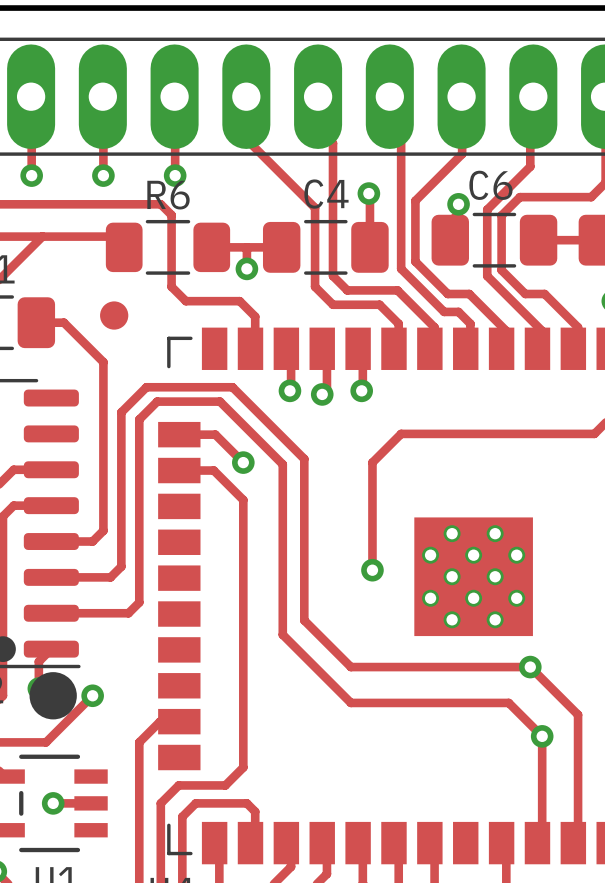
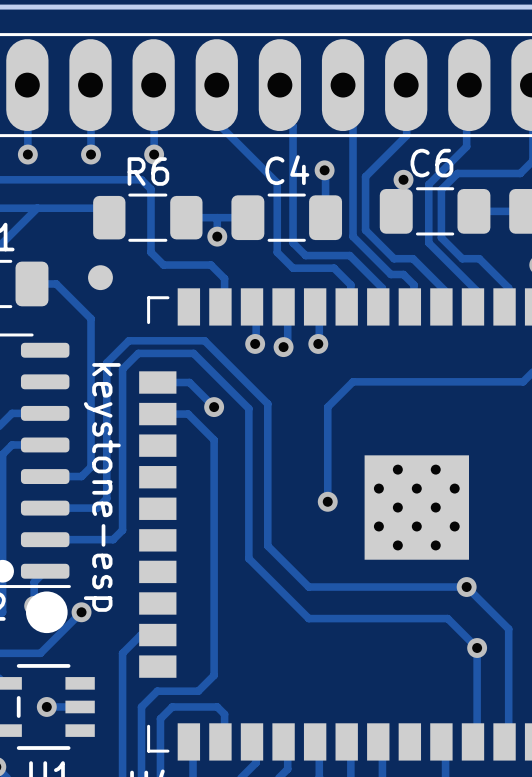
text: none -> keystone-esp (102, 487)

